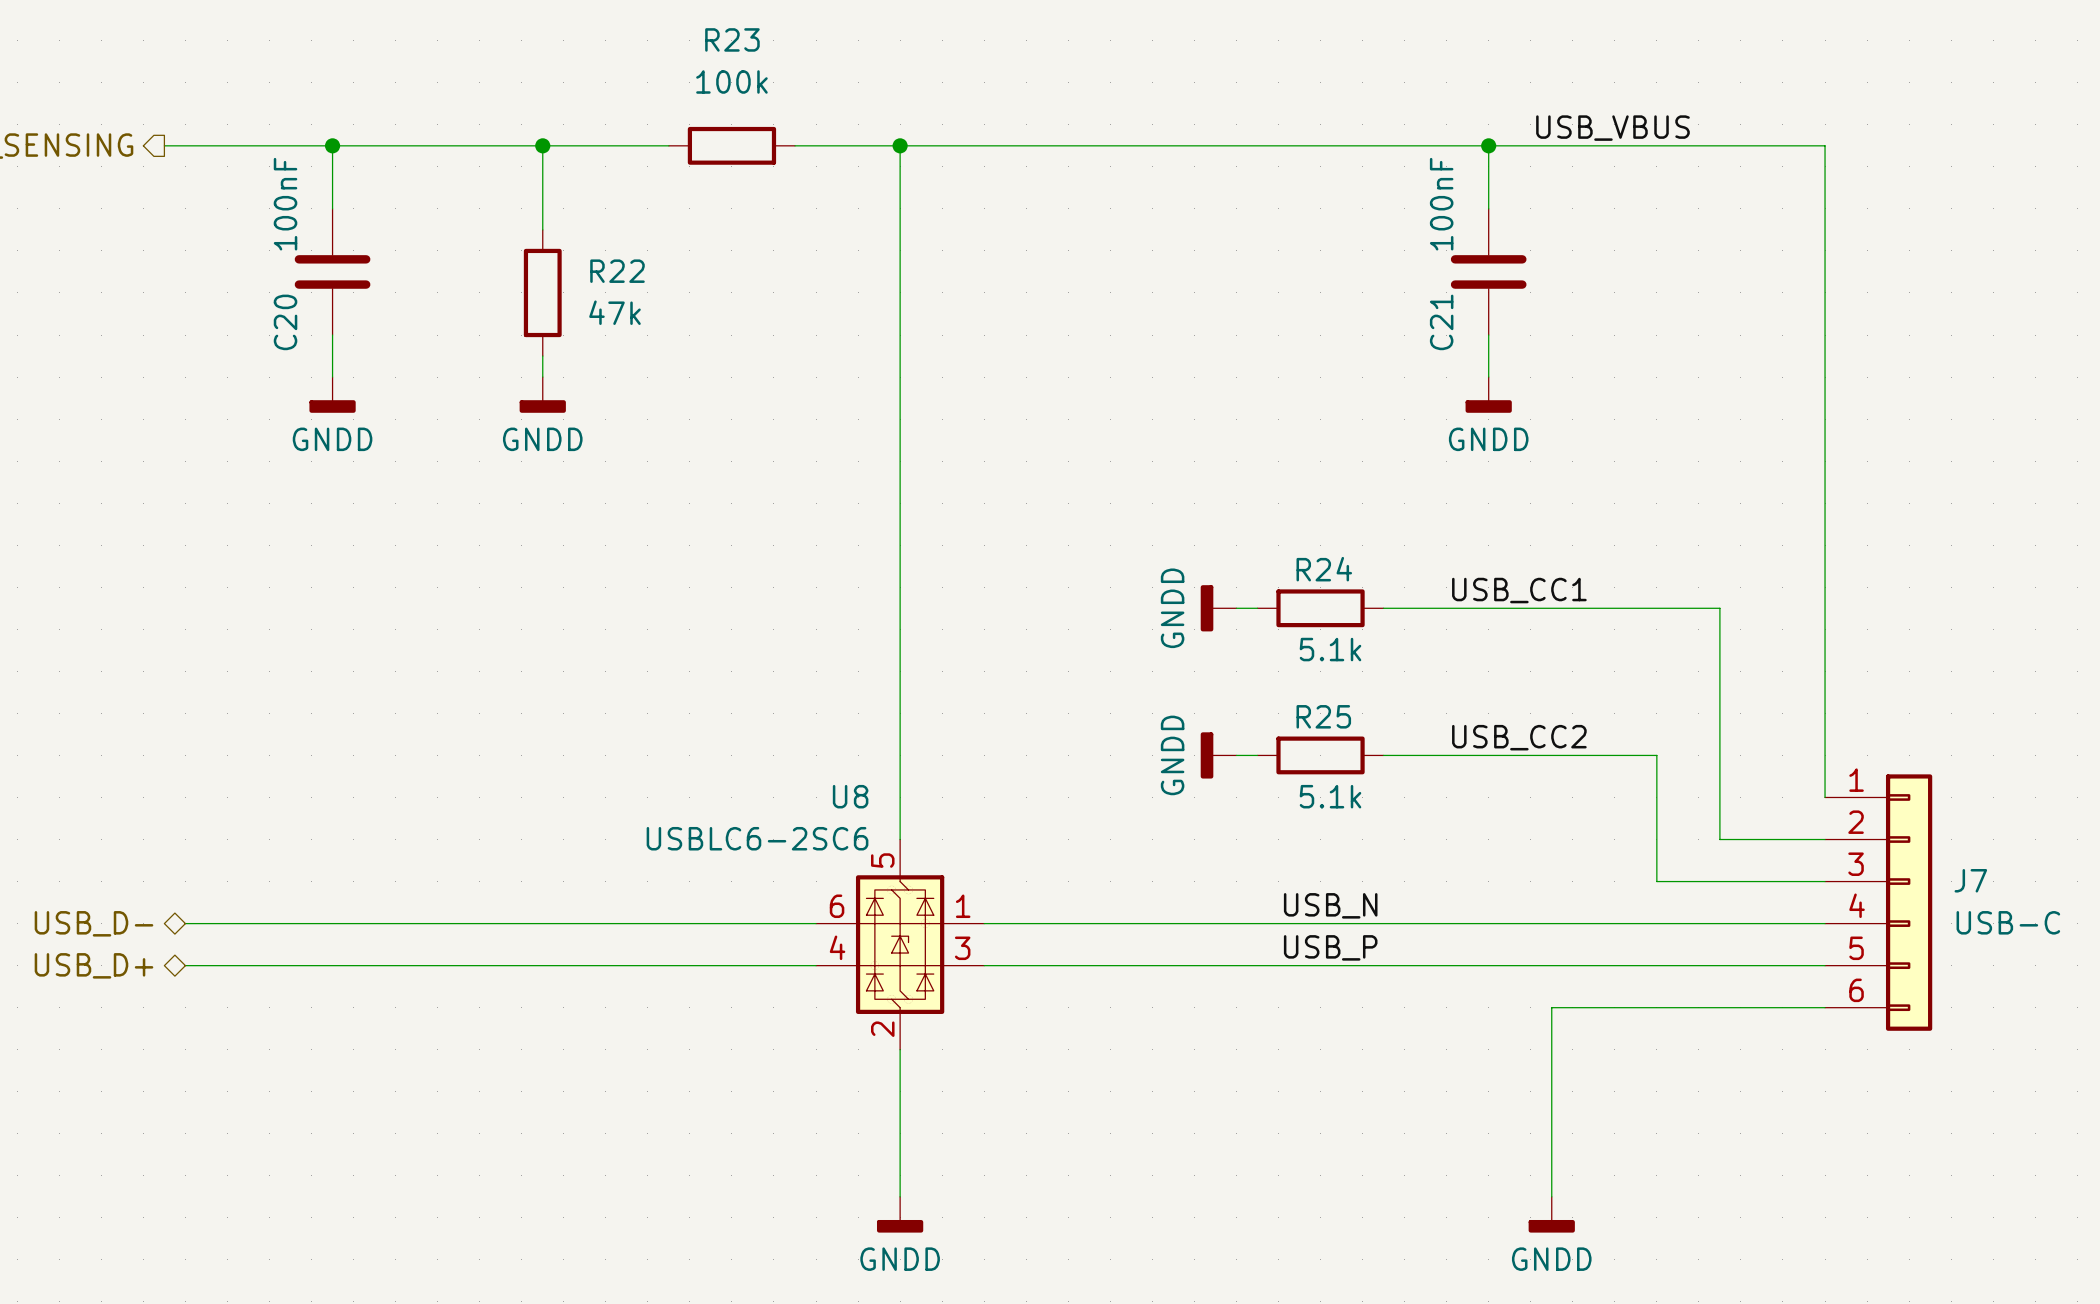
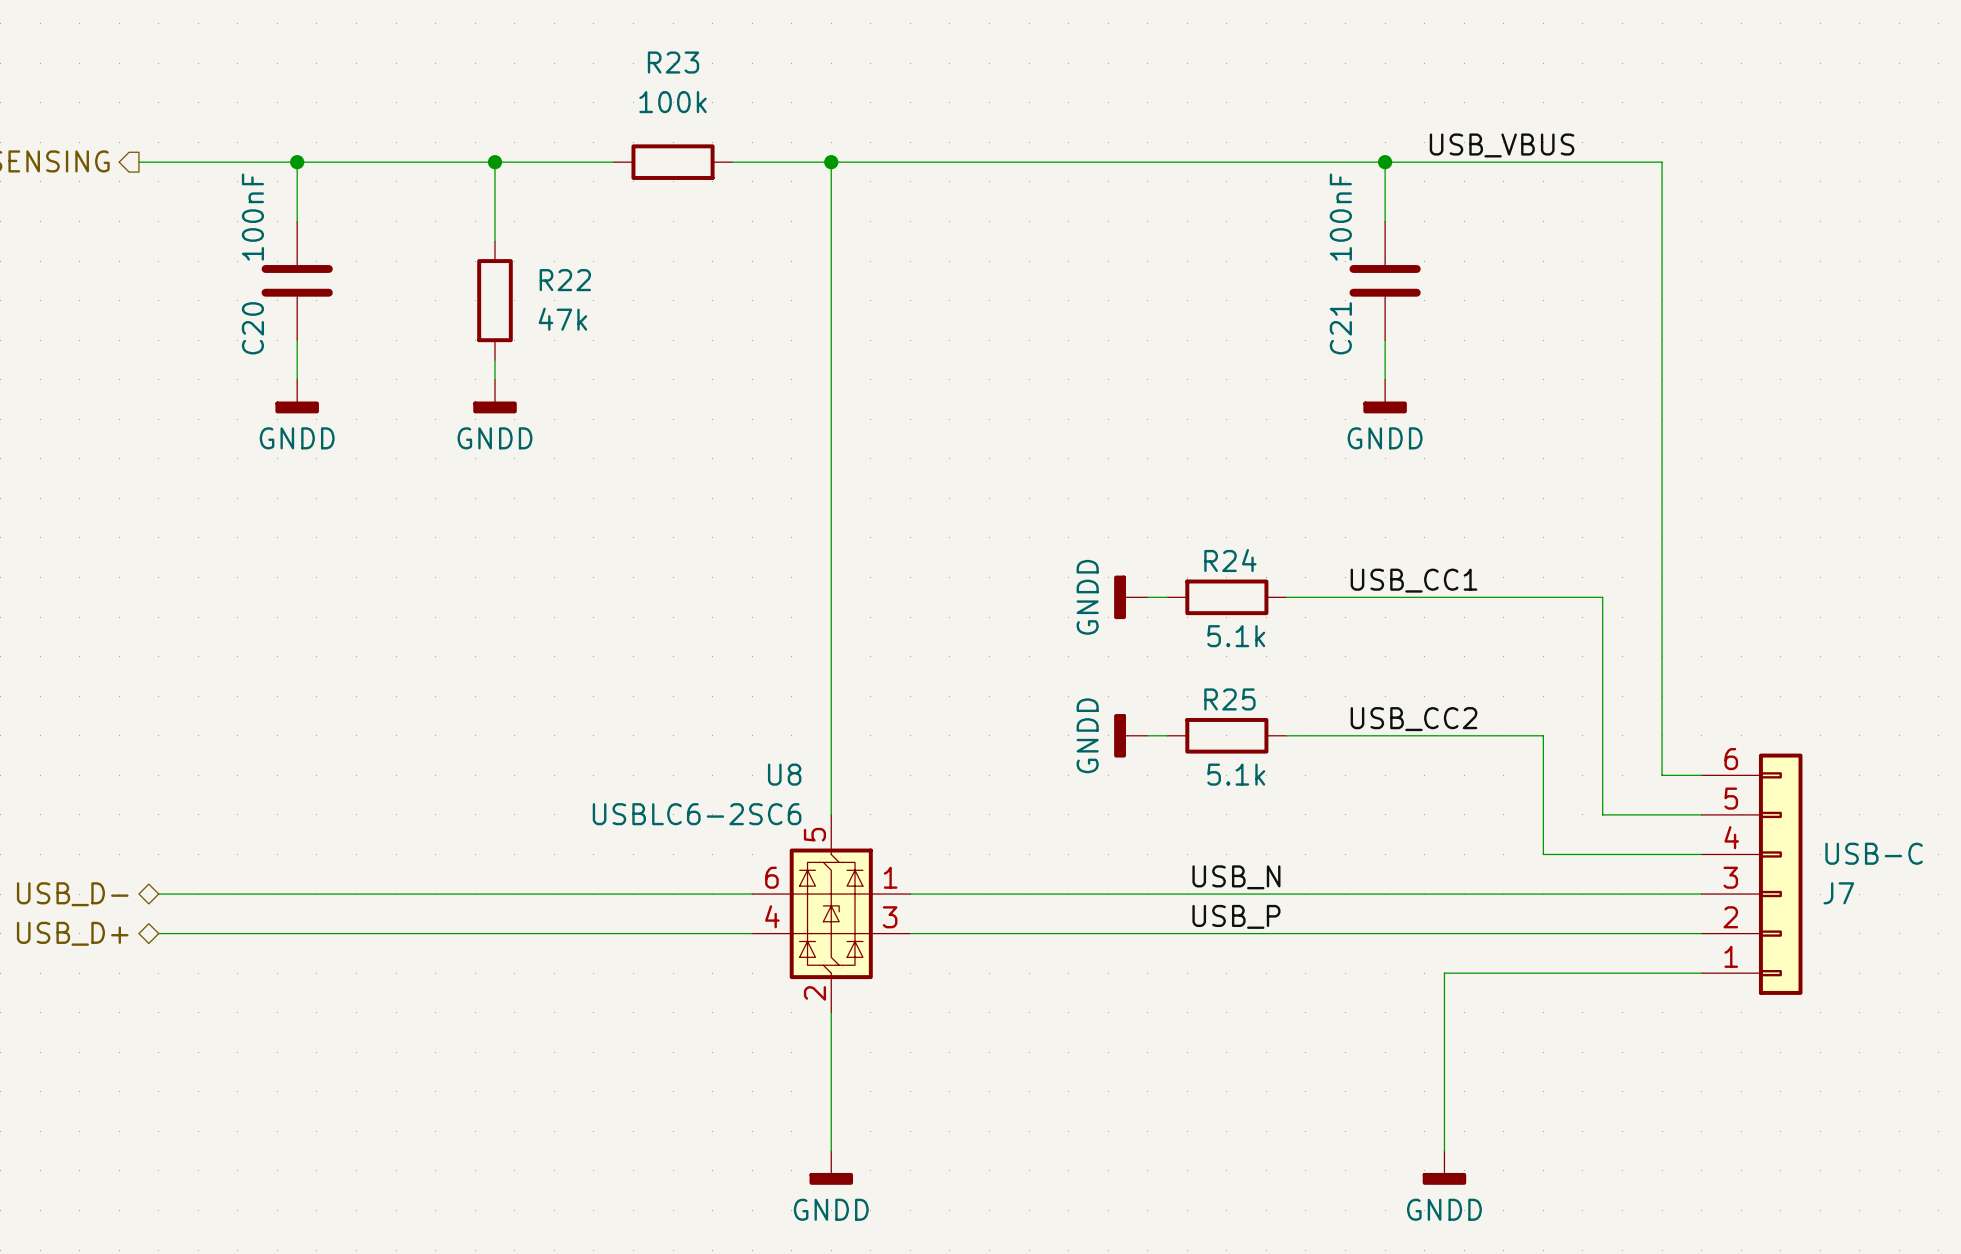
wire: (1782, 145) (1825, 145) (1825, 797) -> (1662, 162) (1662, 775) (1701, 775)
J7 flip: as is (1909, 902) -> up-down (1780, 874)

